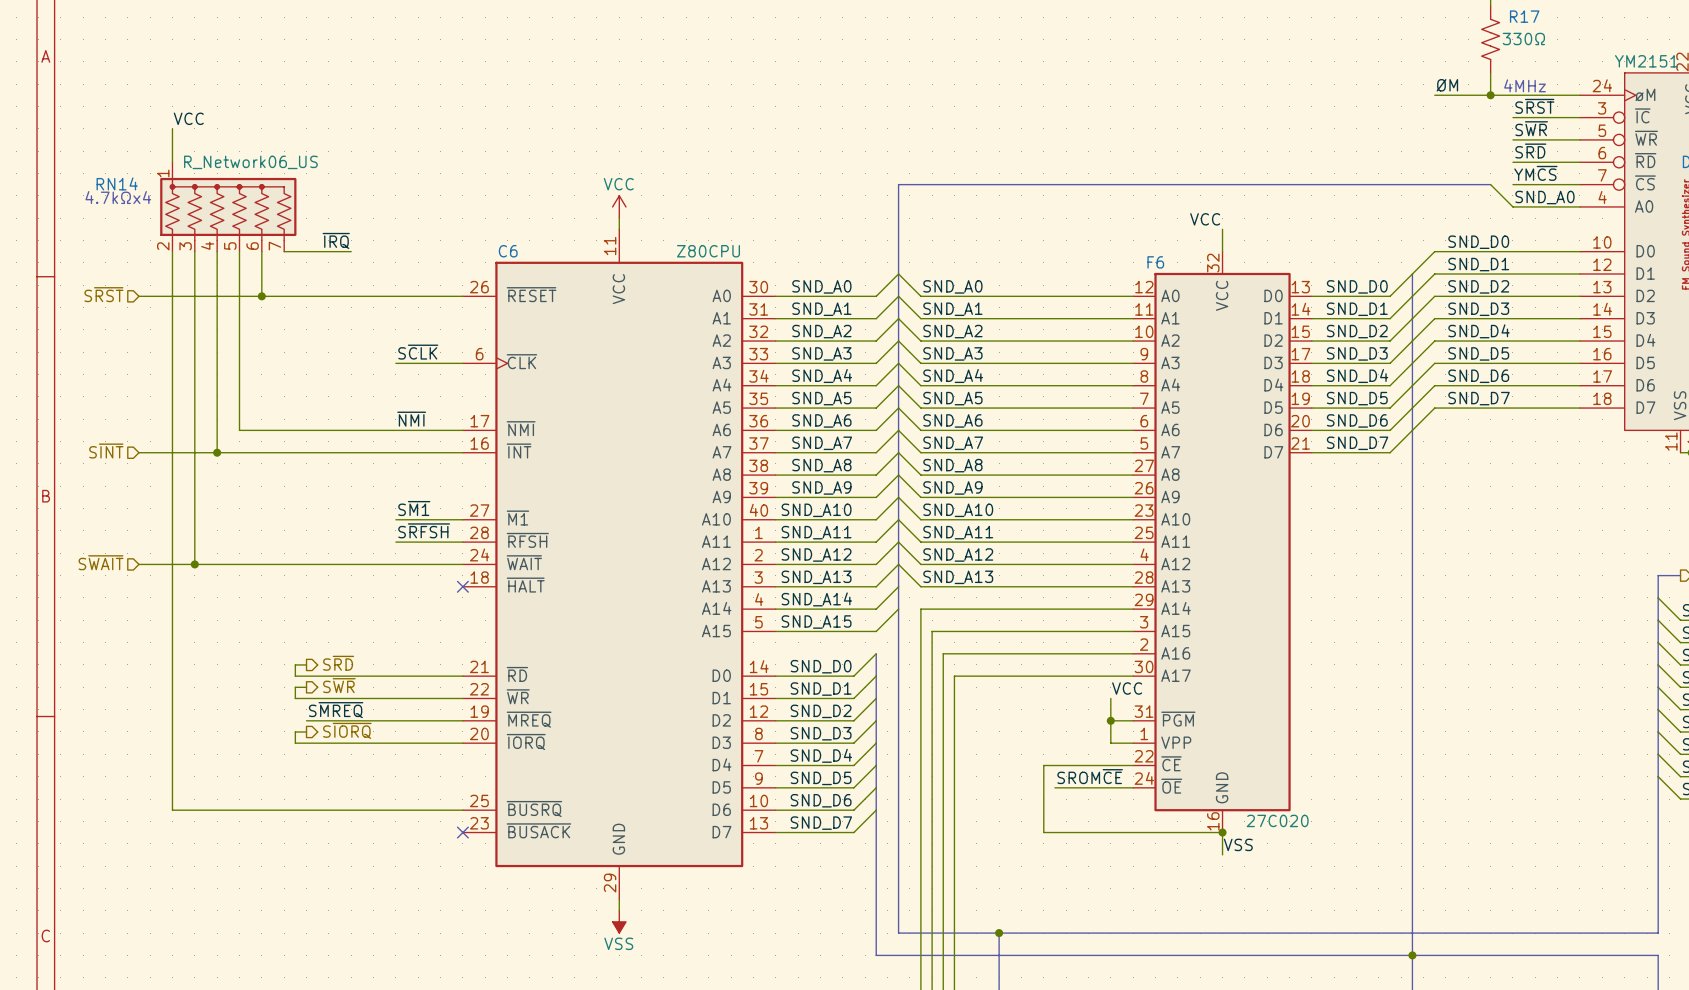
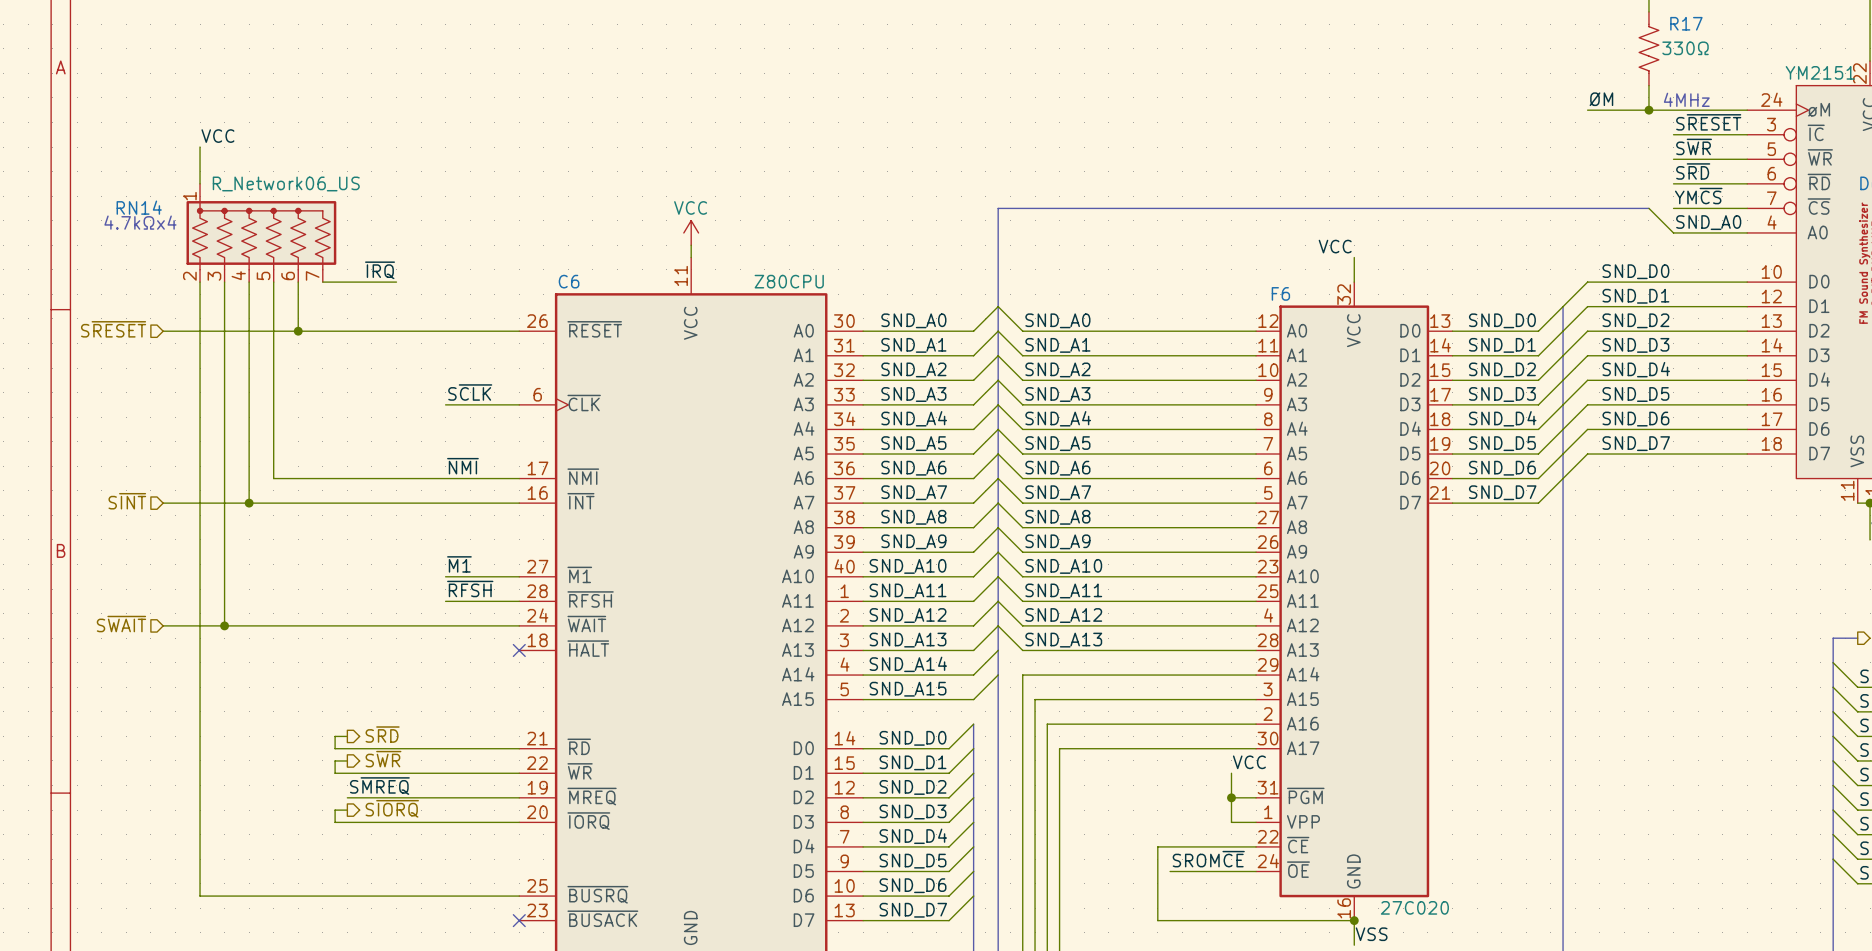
label: S~{RST} (1534, 106) -> S~{RESET} (1708, 122)
hierarchical label: S~{RST} (103, 294) -> S~{RESET} (113, 329)
label: S~{M1} (414, 508) -> ~{M1} (459, 564)
label: S~{RFSH} (424, 530) -> ~{RFSH} (470, 588)

